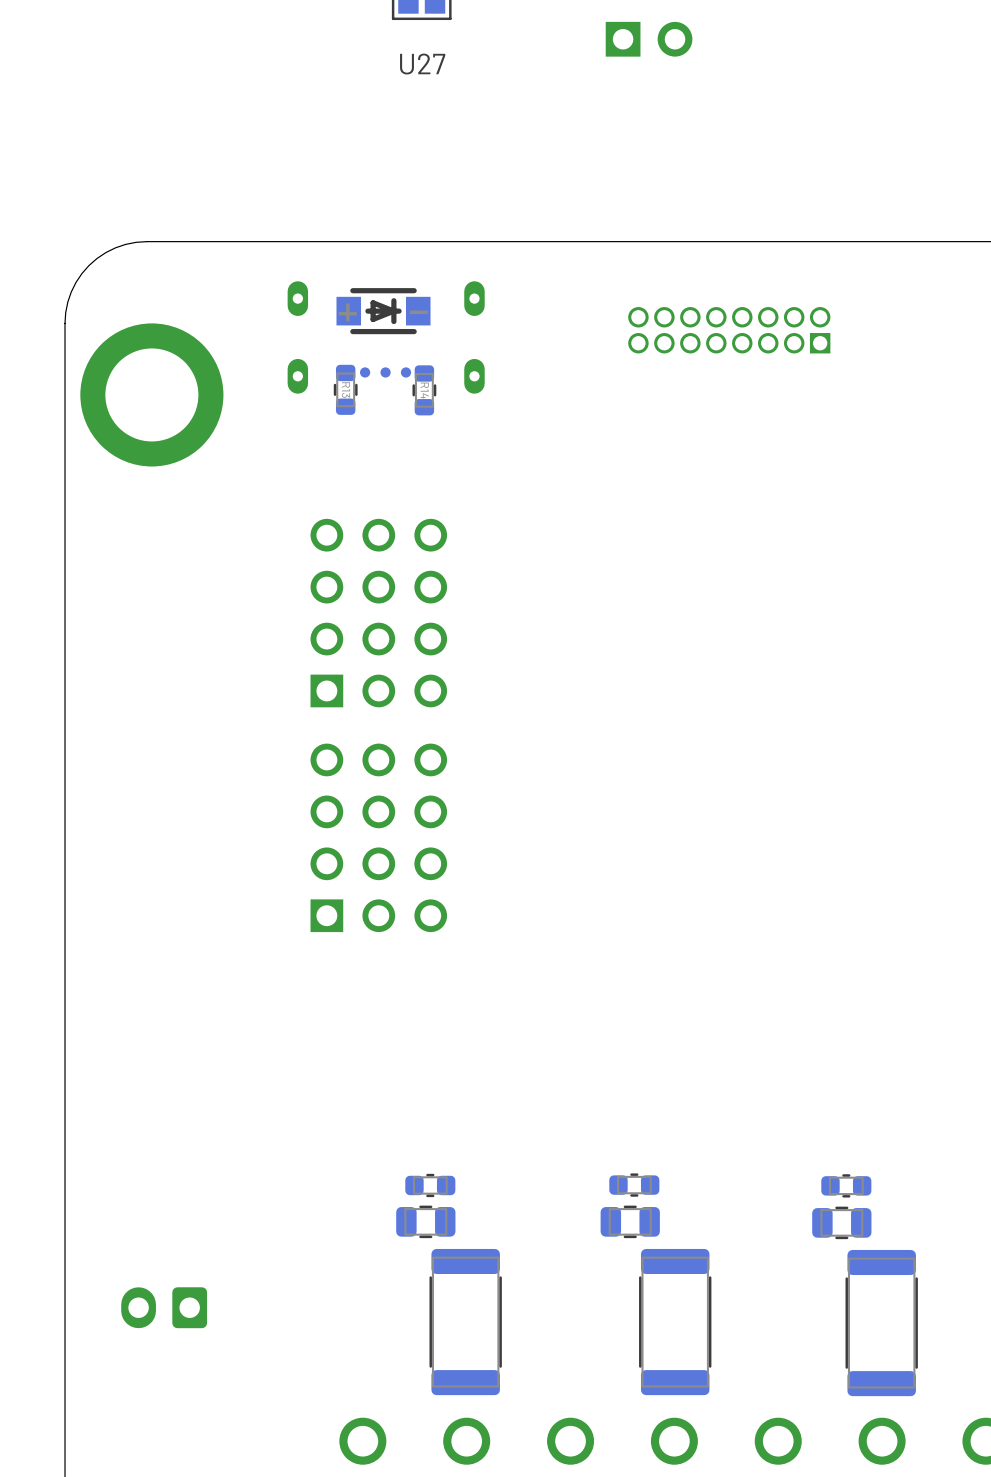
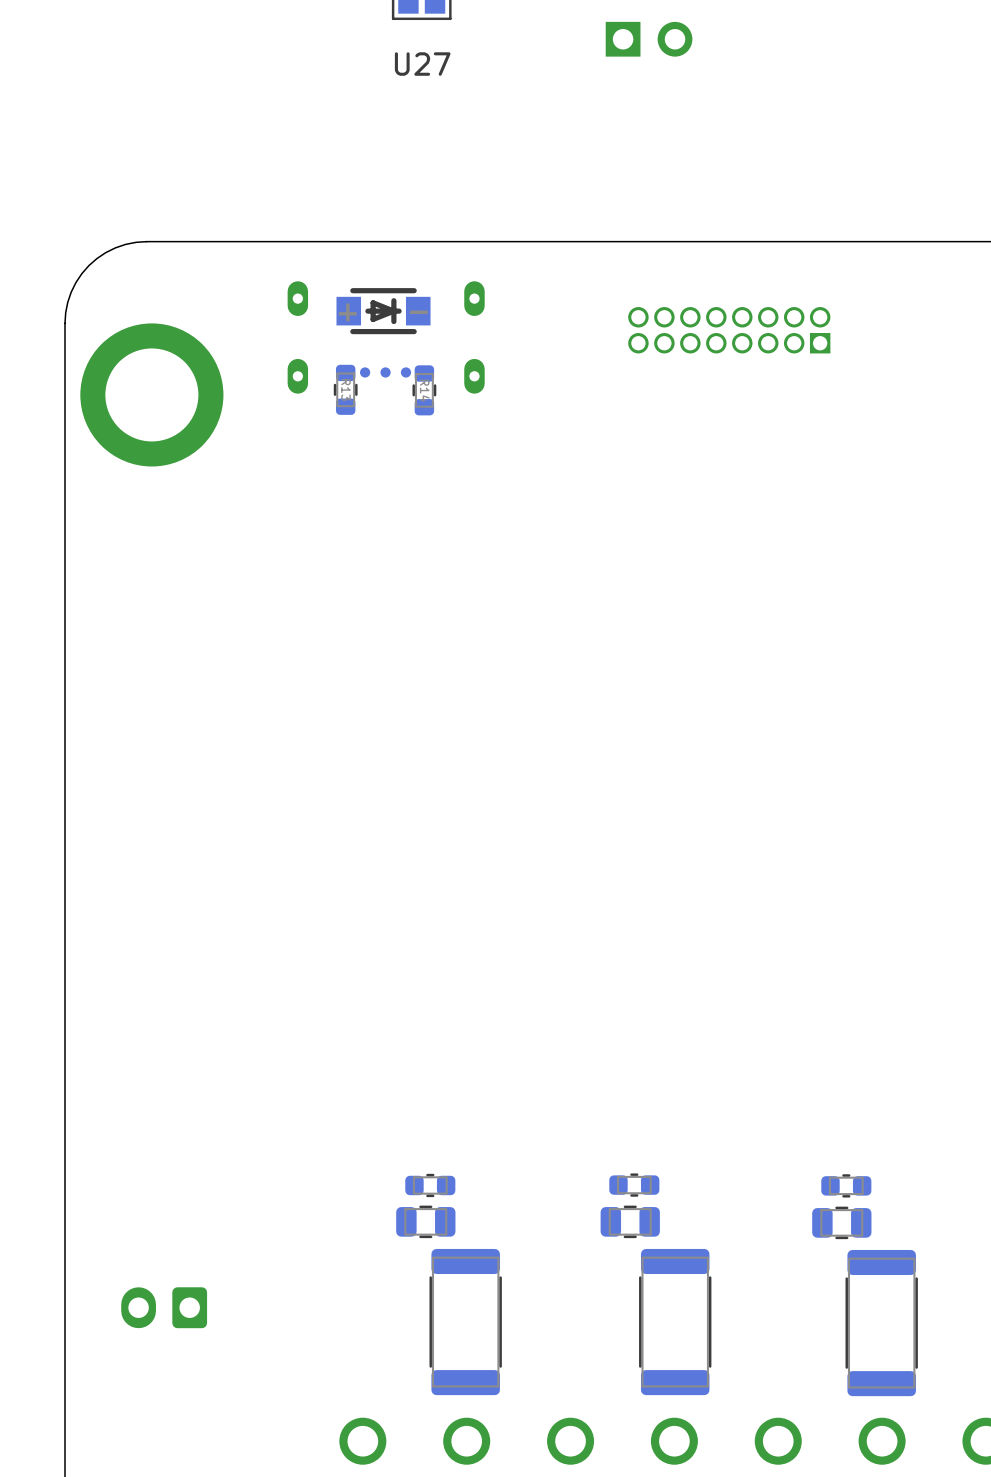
part: (378, 613) -> none
part: (378, 837) -> none

